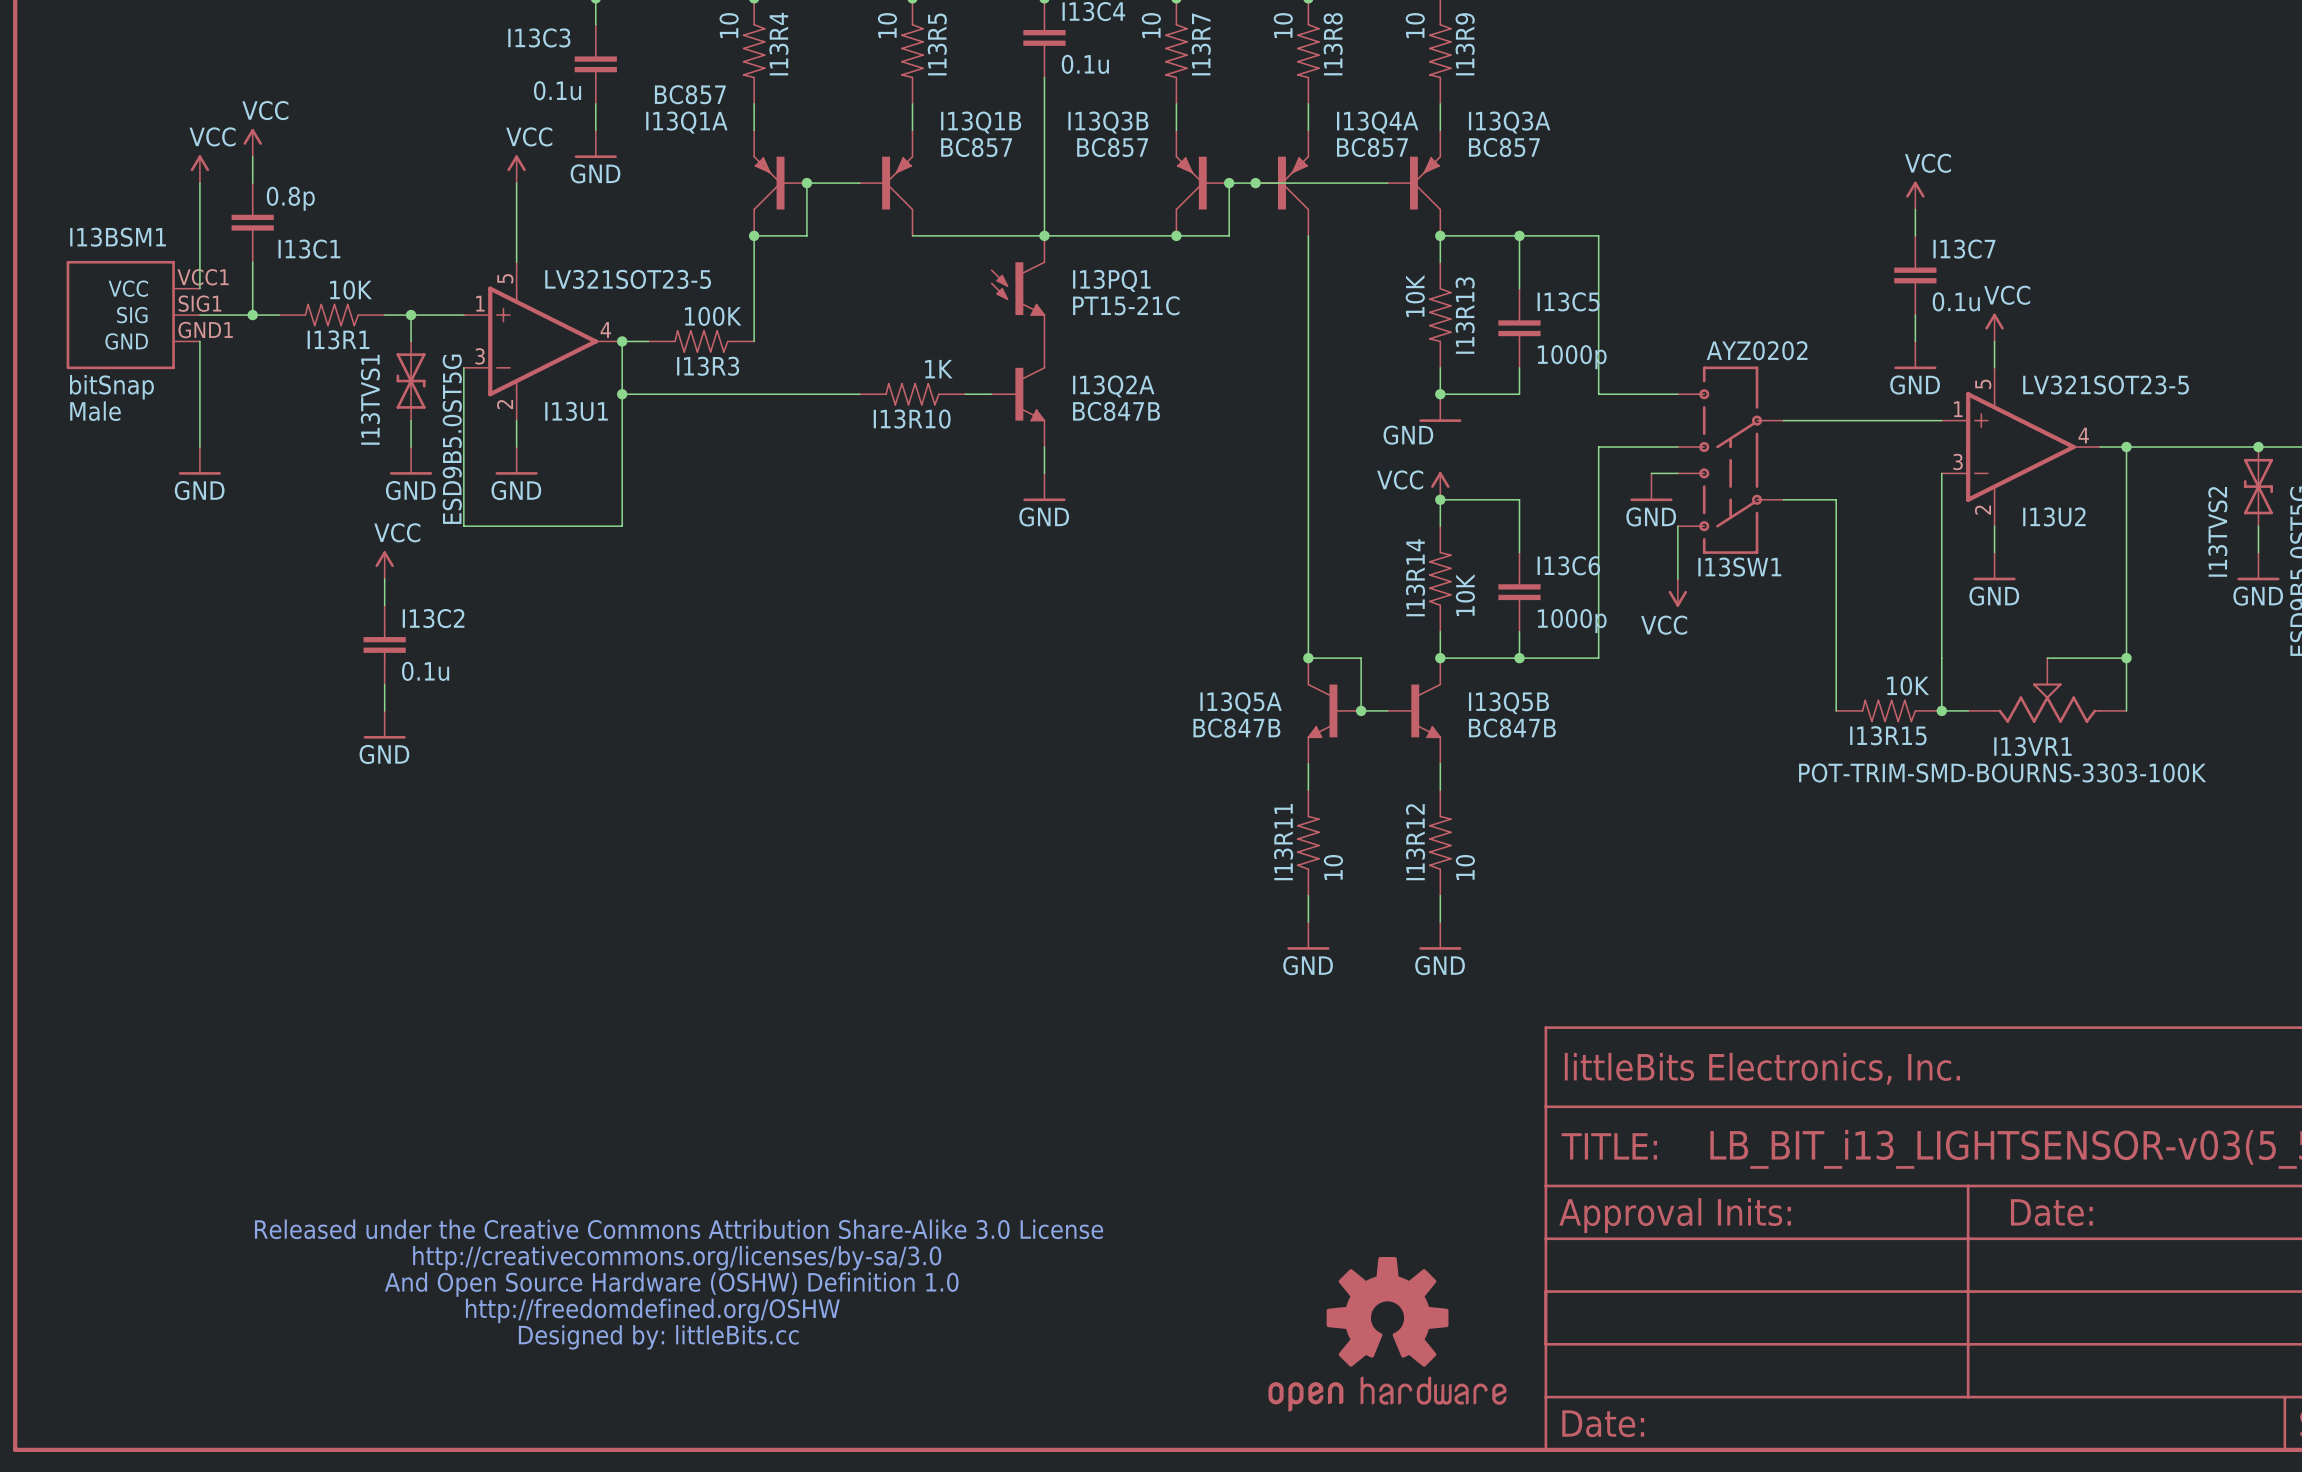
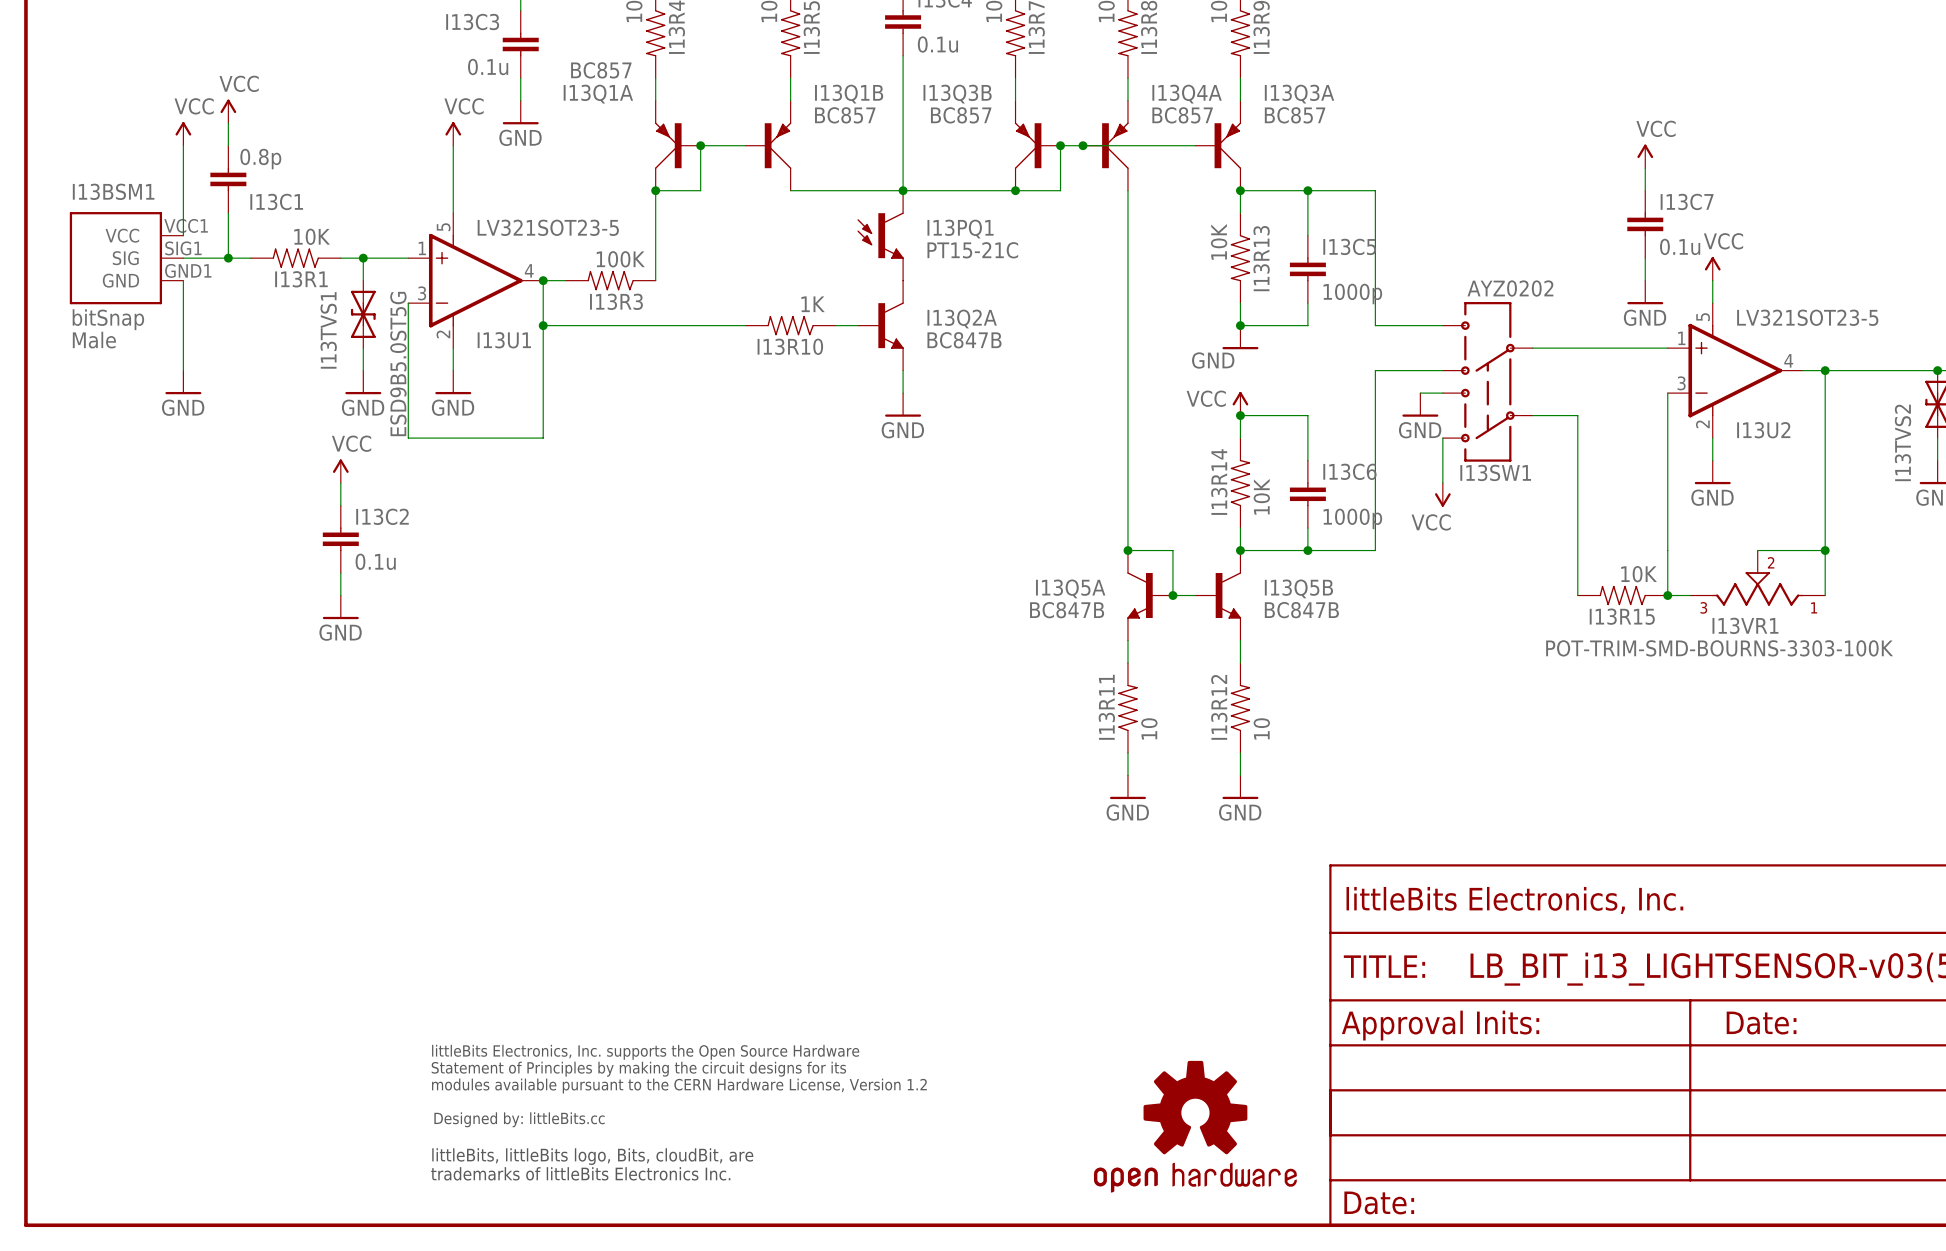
I13VR1 text: none -> 2 (1771, 562)
I13VR1 text: none -> 3 (1703, 607)
I13VR1 text: none -> 1 (1814, 607)
part: (679, 1284) -> none
part: none -> (679, 1112)

